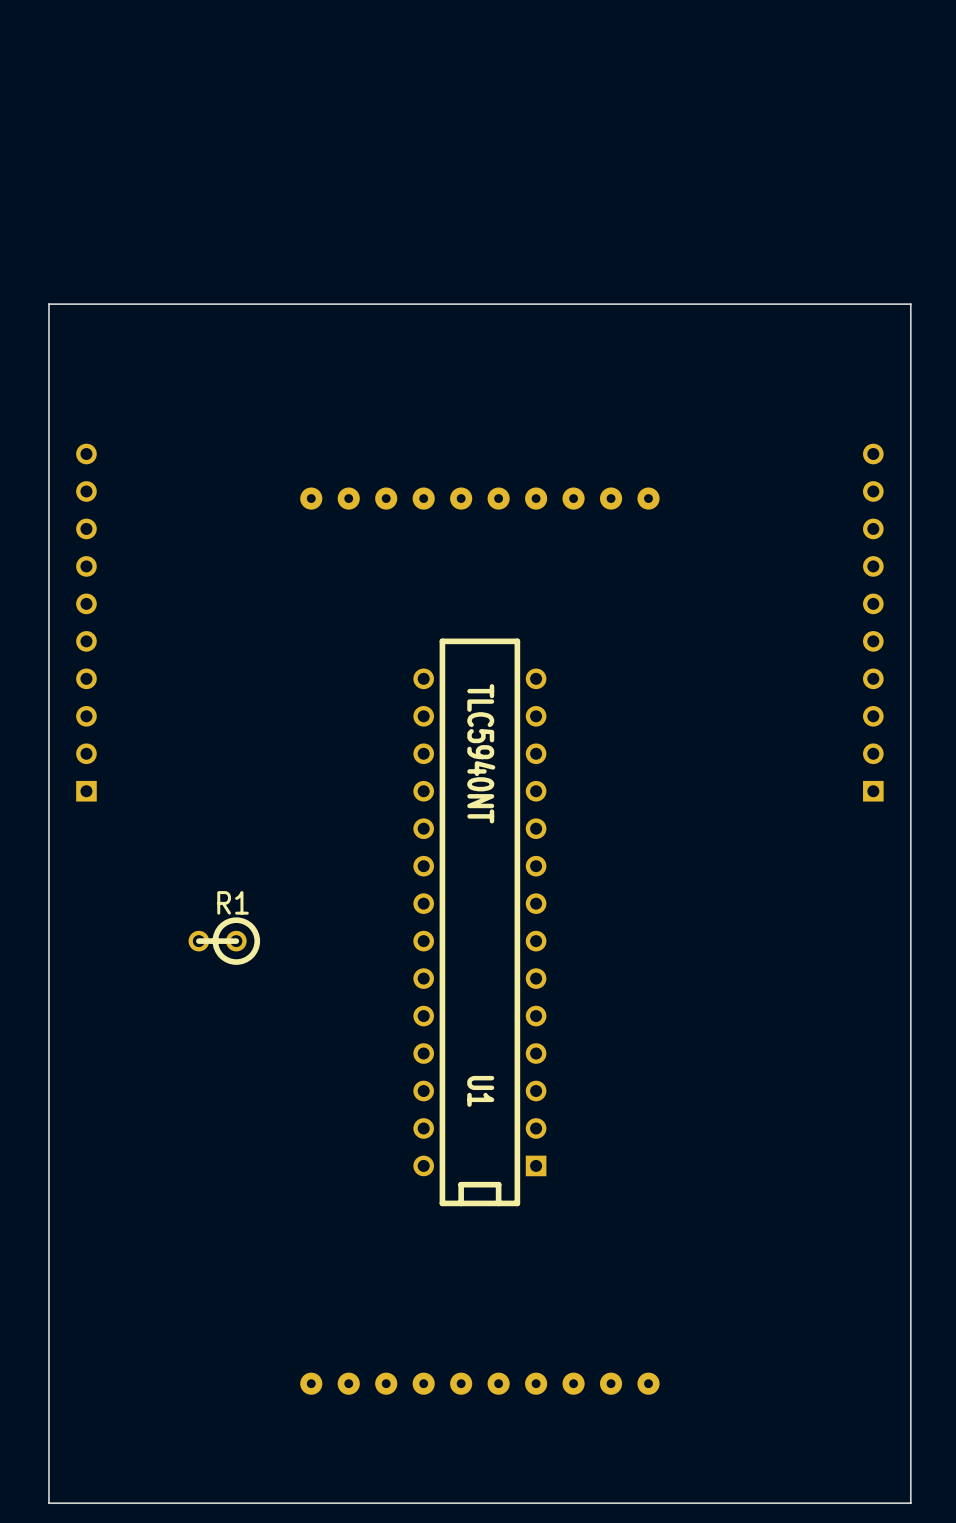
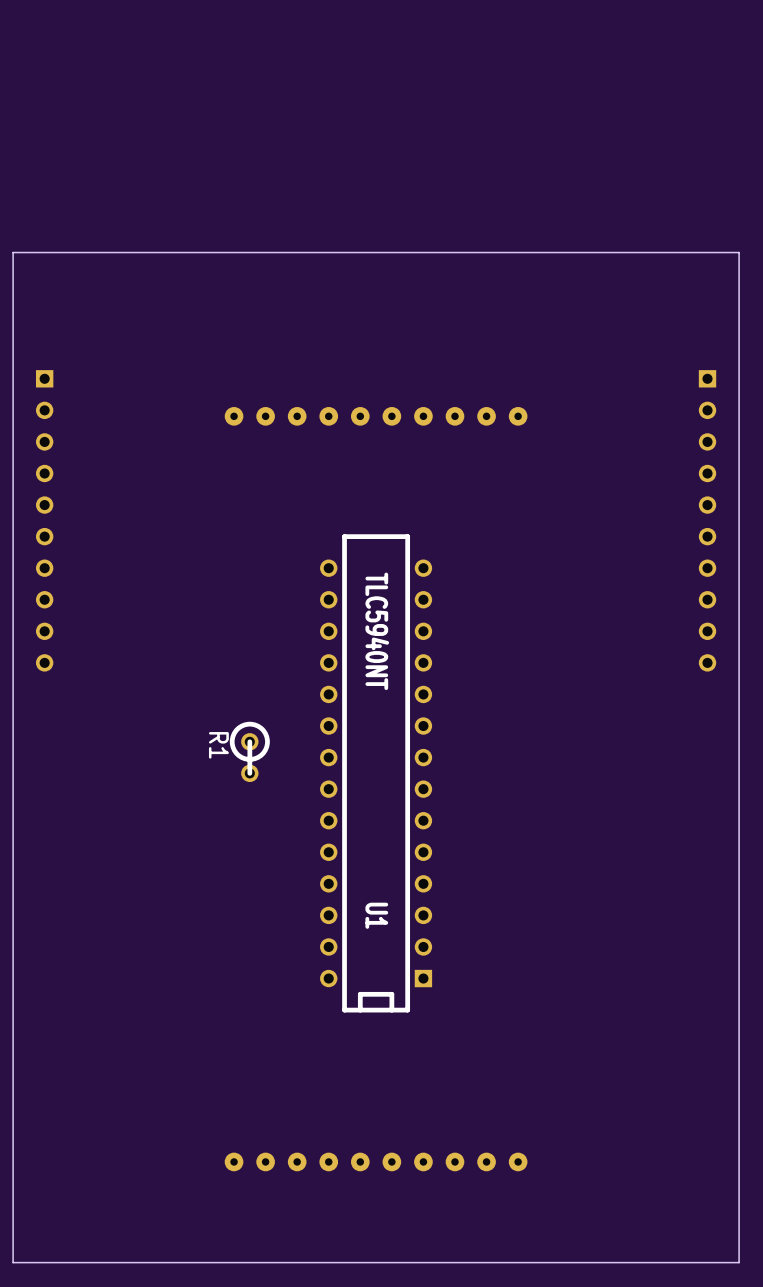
part rotation: 0° (86, 622) -> 180° (44, 520)
part rotation: 0° (873, 622) -> 180° (707, 520)
R1 rotation: 0° (224, 941) -> 90° counterclockwise (249, 751)
R1 position: (224, 941) -> (249, 751)

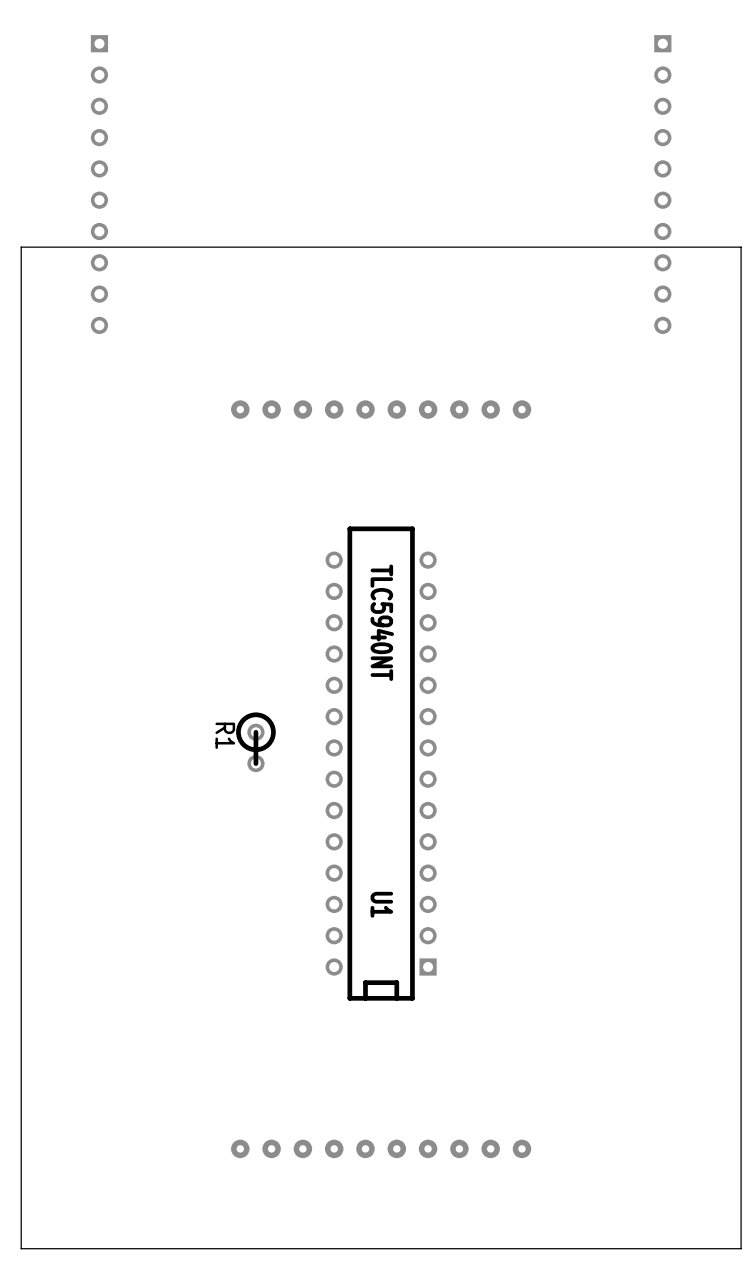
part: none -> (99, 184)
part: none -> (662, 184)
part: (44, 520) -> none
part: (707, 520) -> none

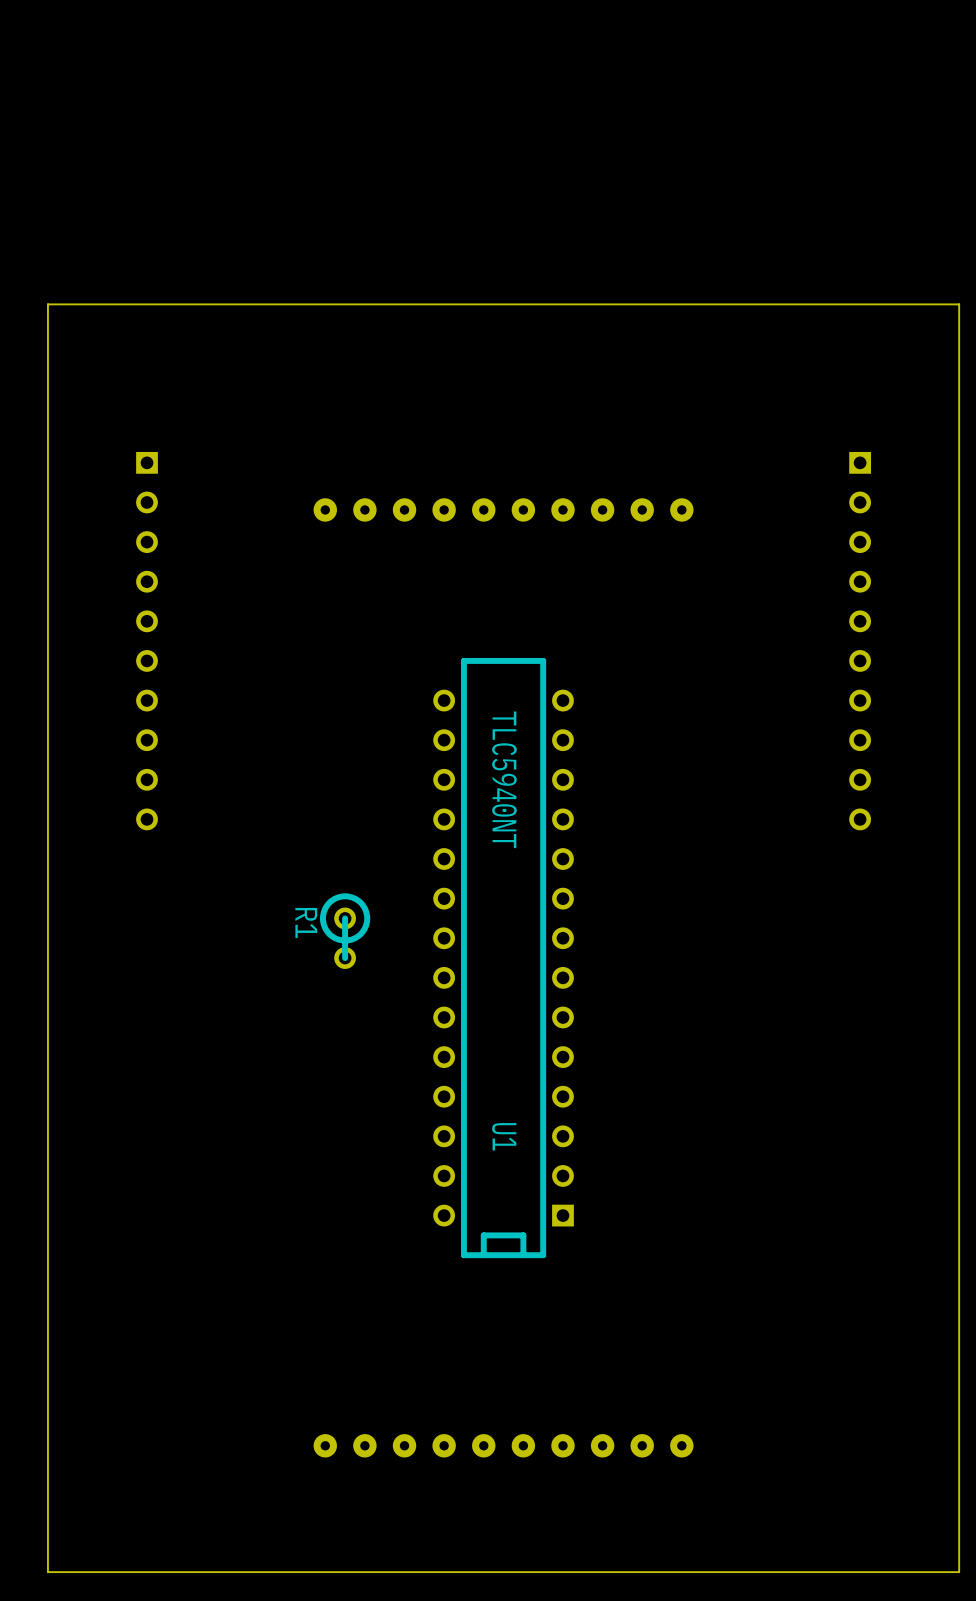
part: (99, 184) -> none
part: (662, 184) -> none
part: none -> (147, 641)
part: none -> (860, 641)

